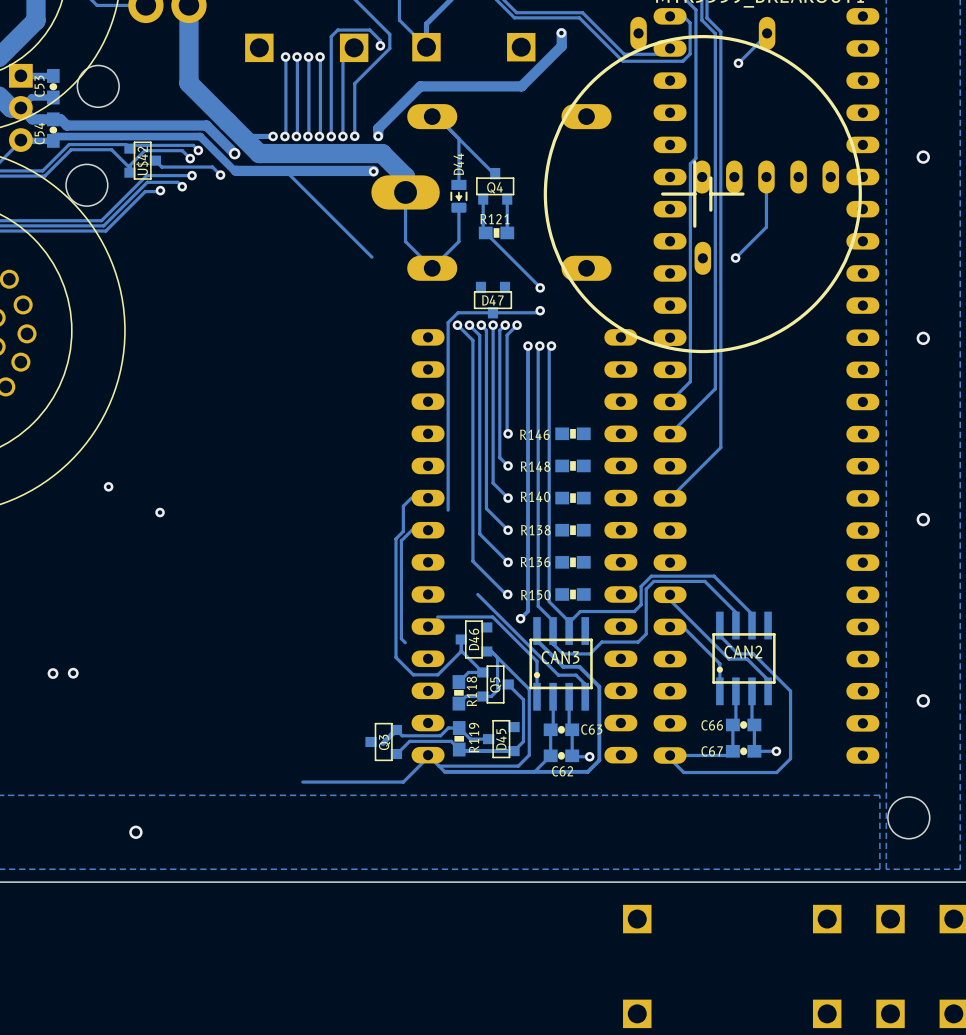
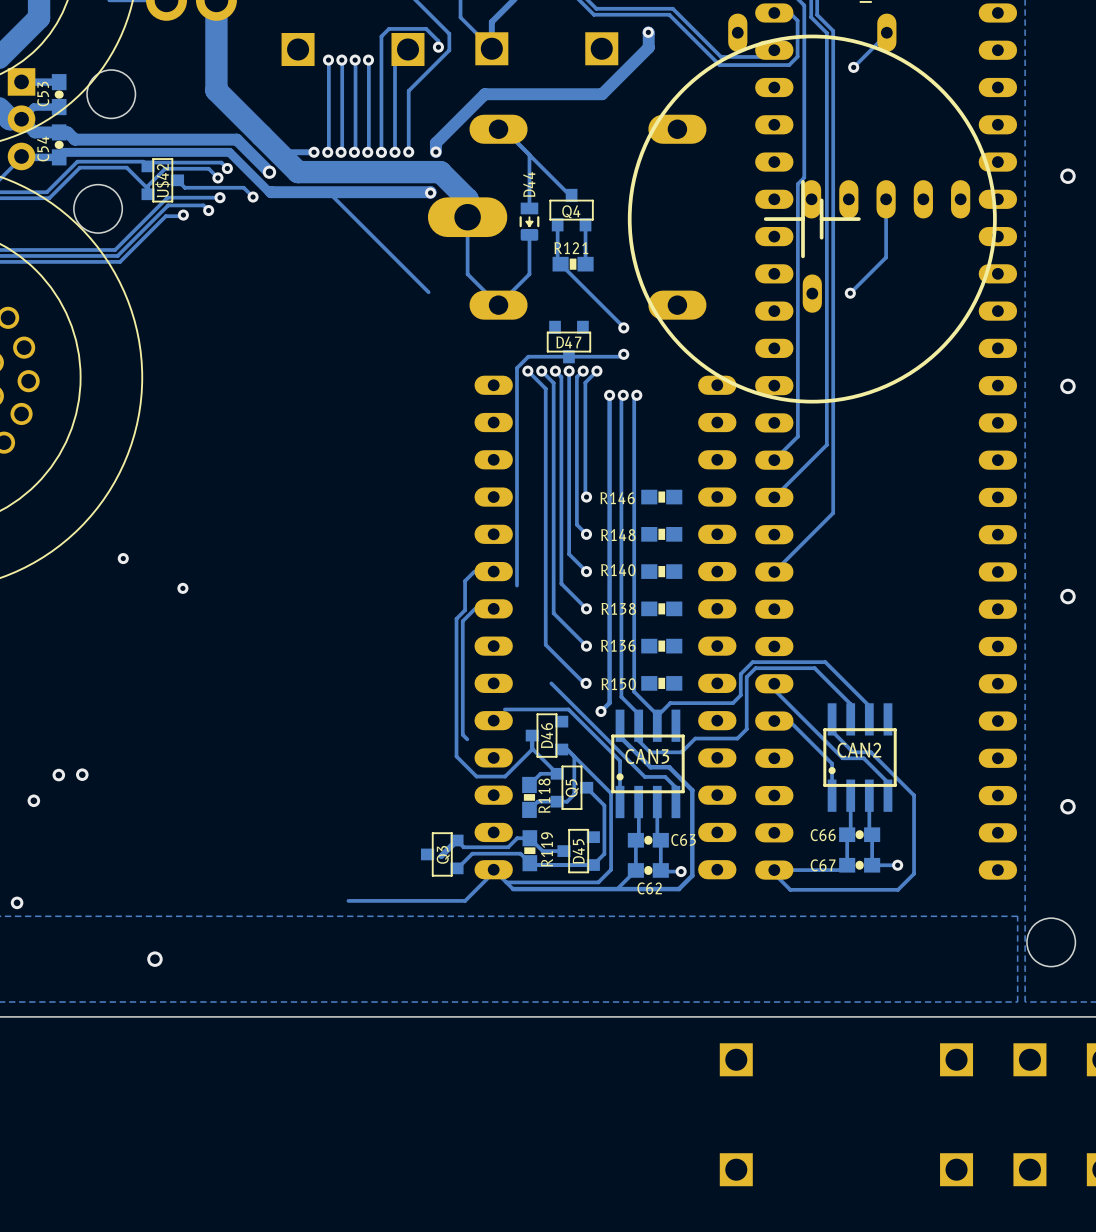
via: none -> (33, 800)
via: none -> (17, 902)

